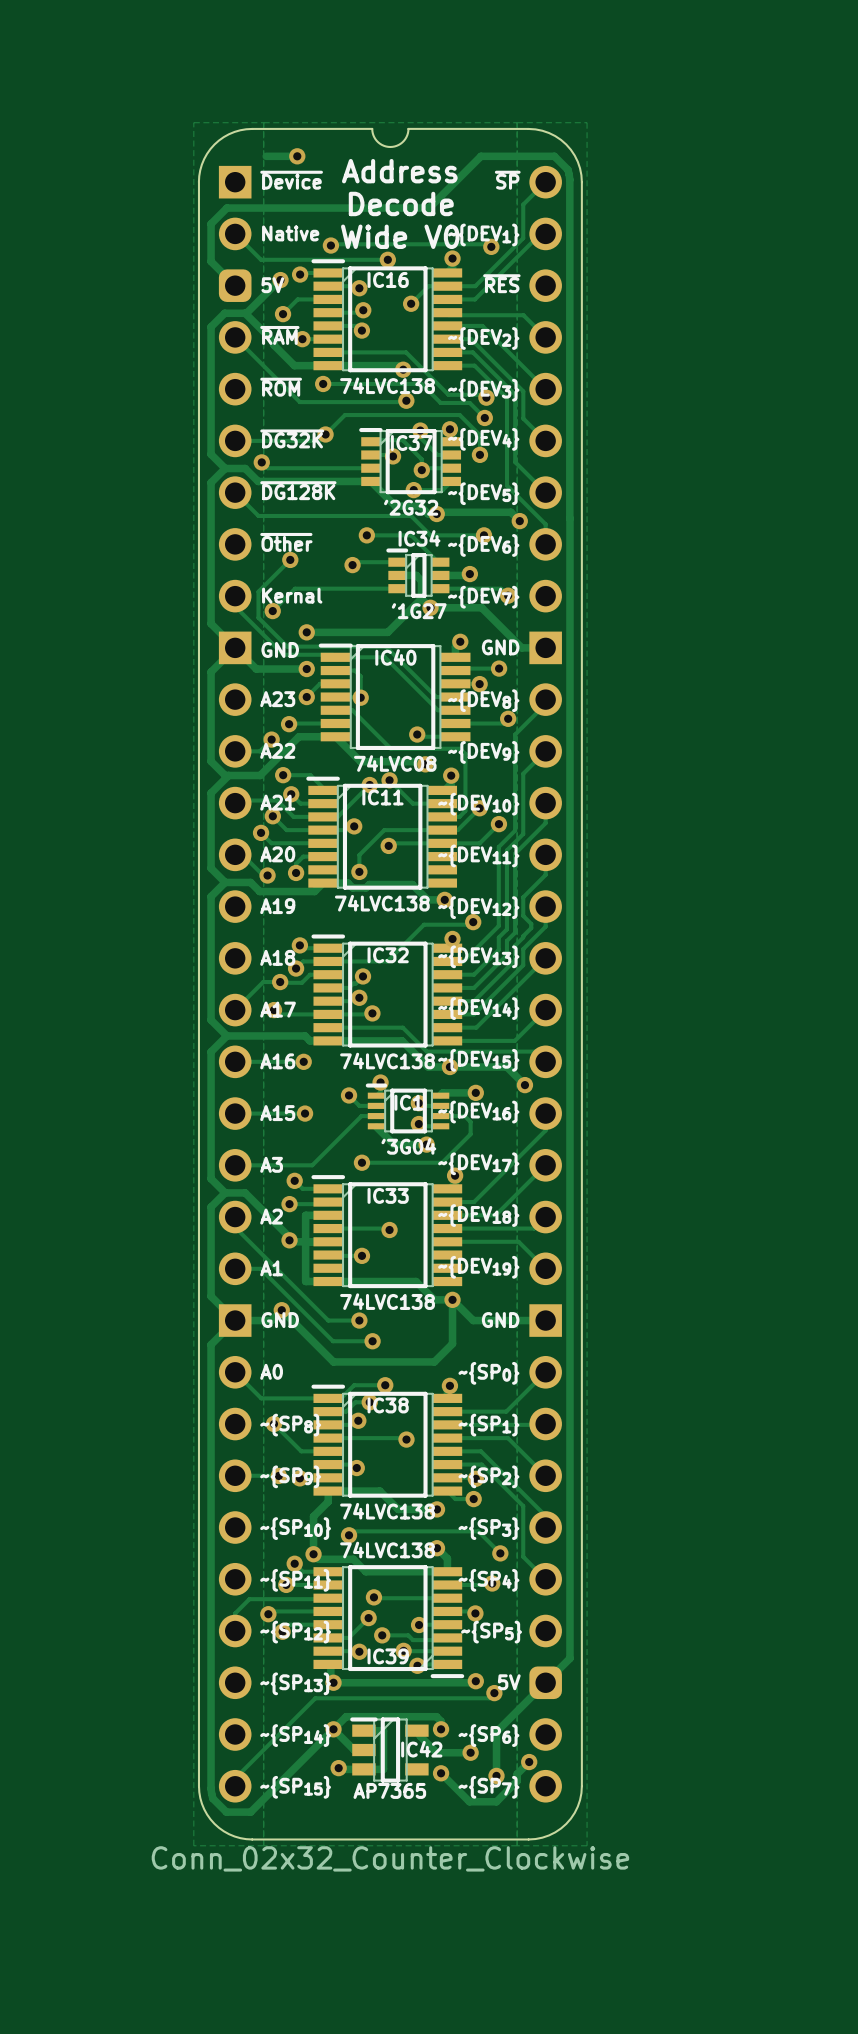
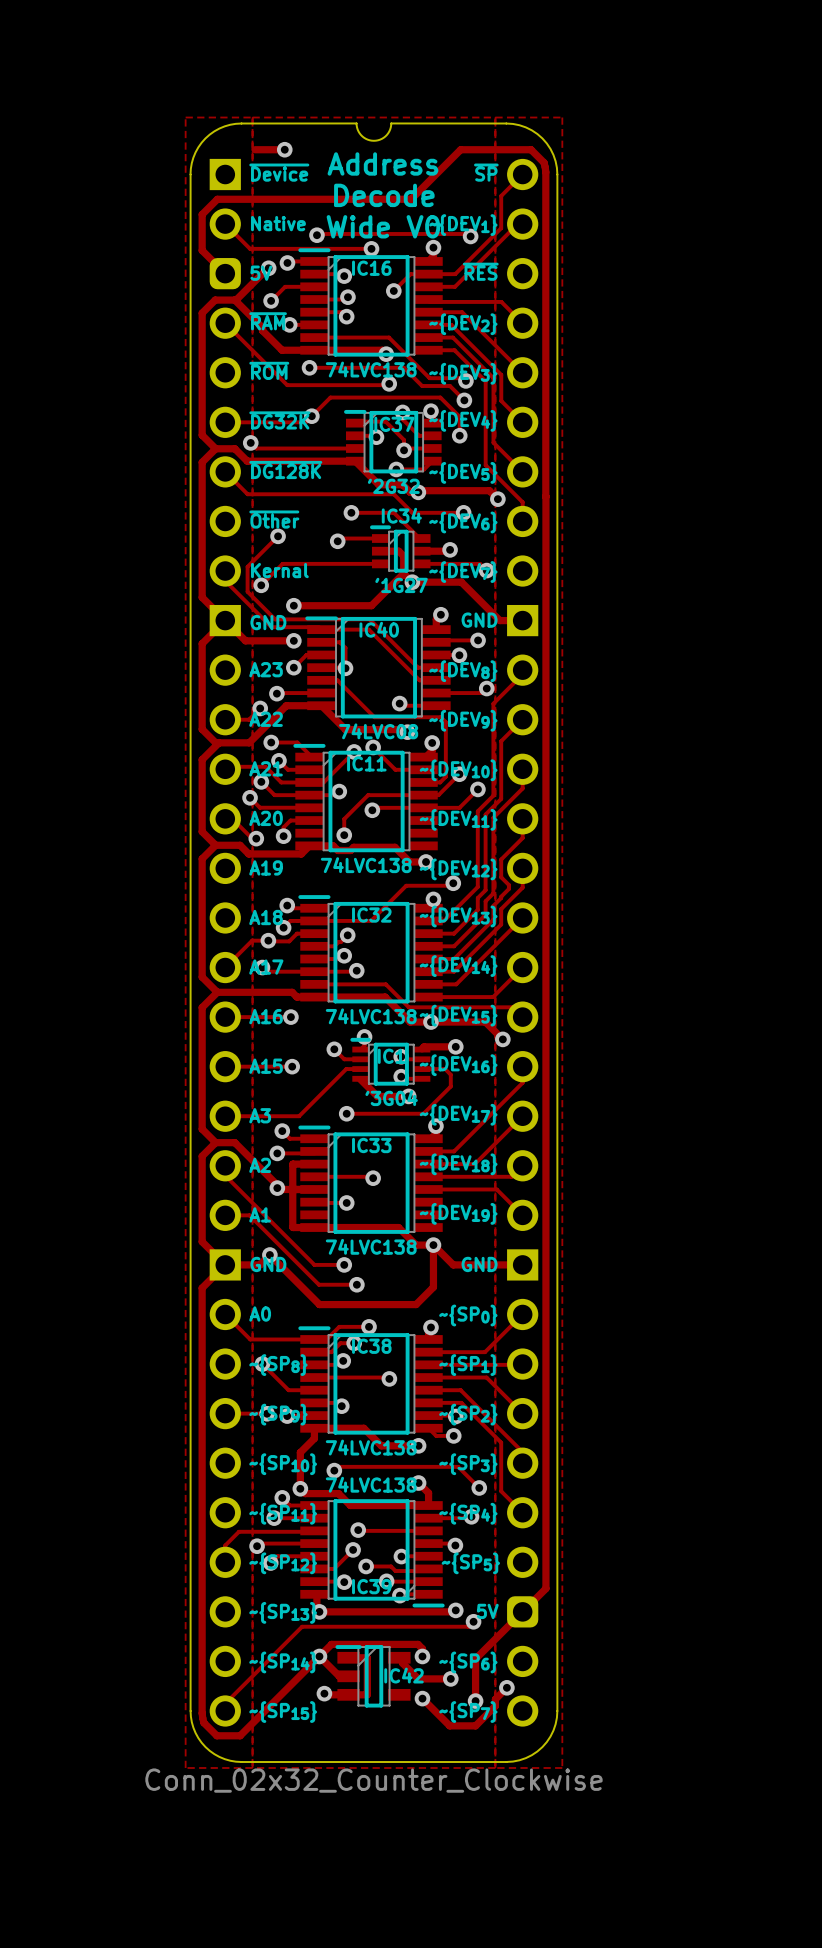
IC42 text: AP7365 (389, 1790) -> none

